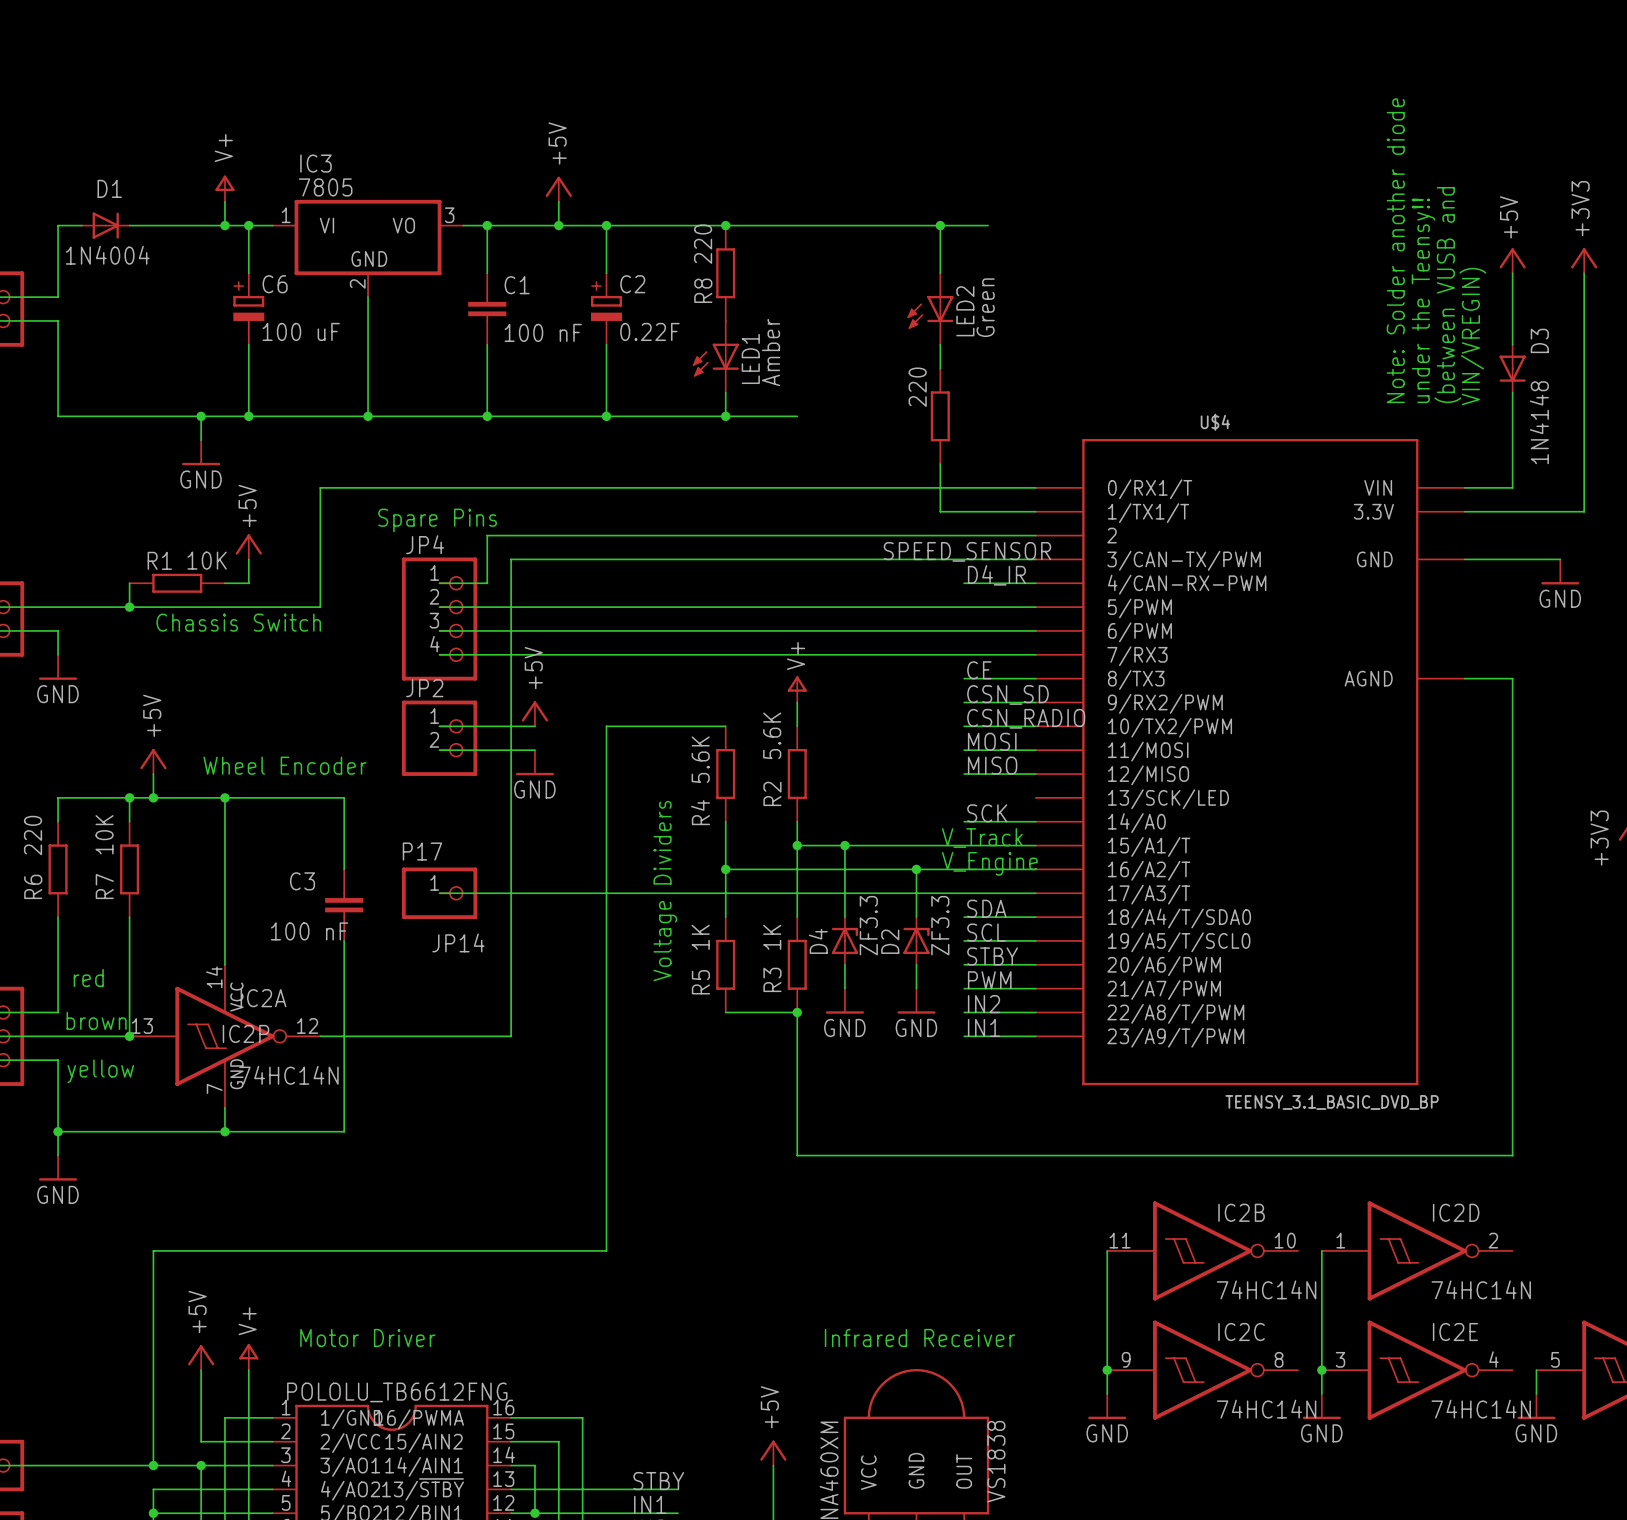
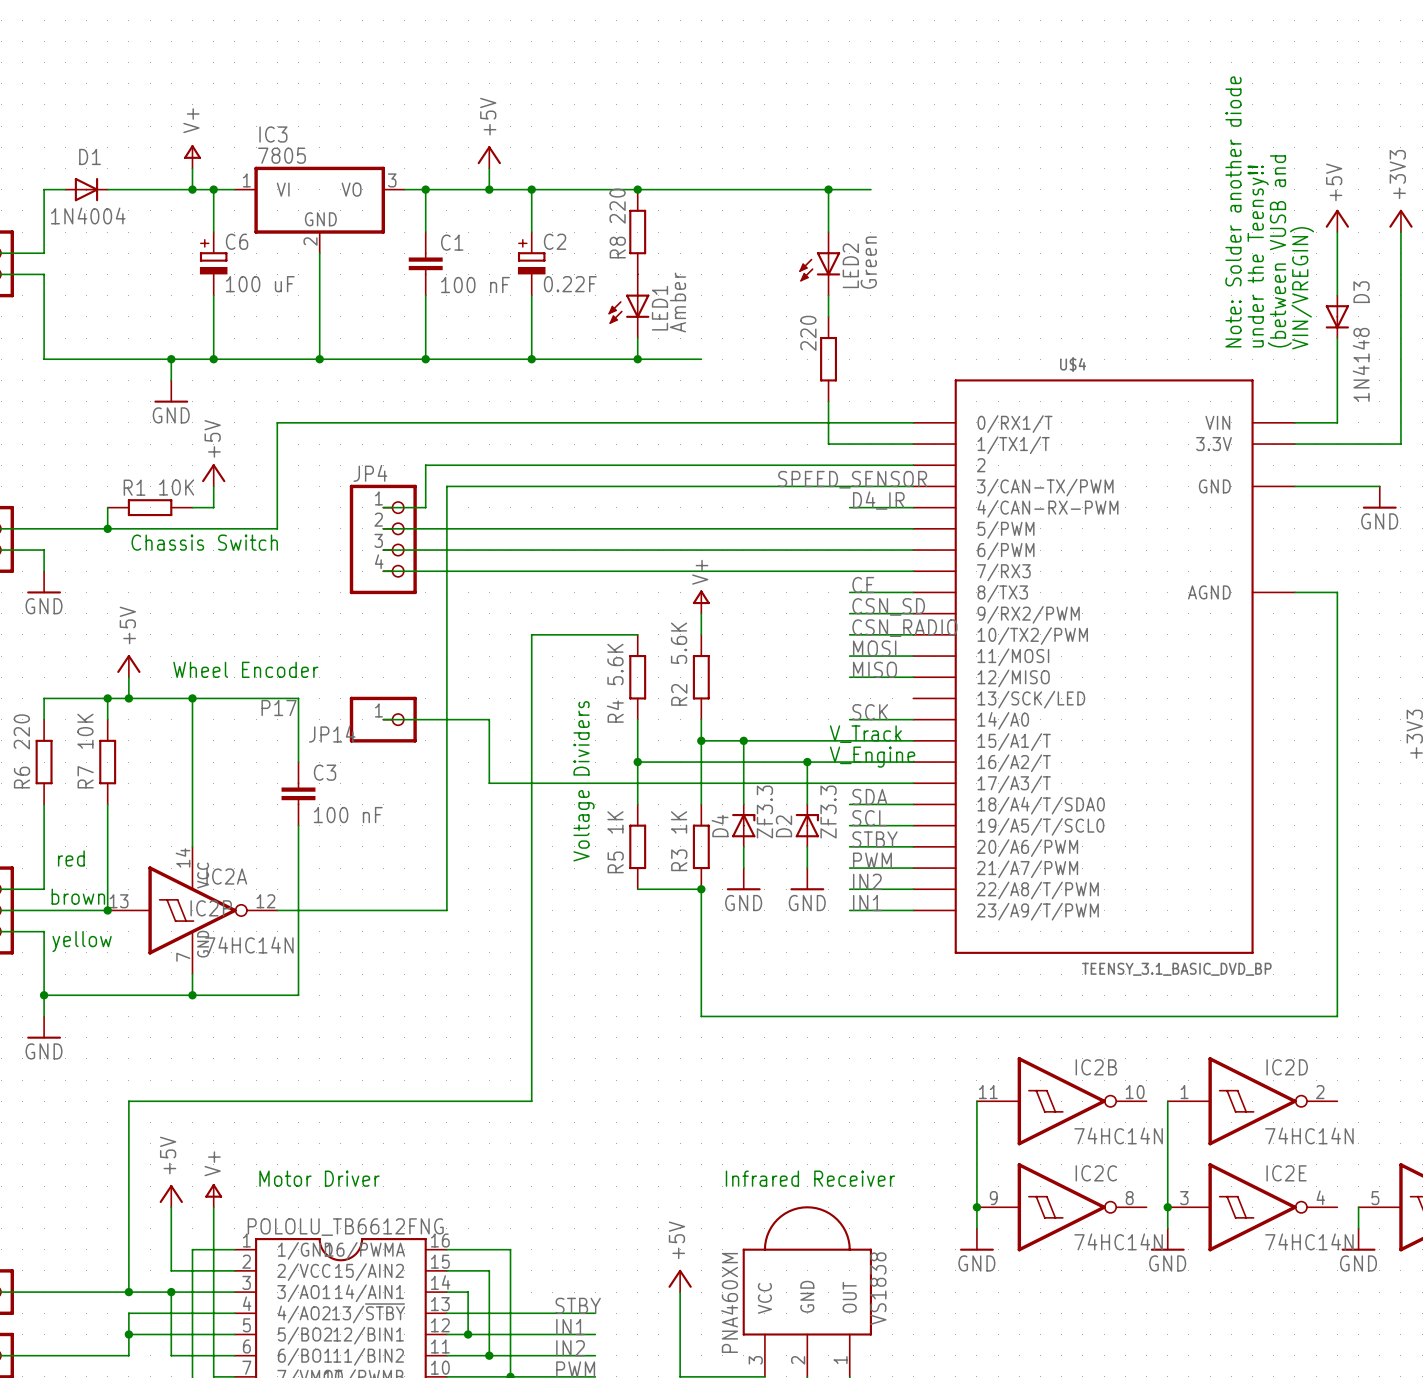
text: Spare Pins (437, 520) -> none
power symbol: +5V (534, 713) -> none
wire: (439, 726) (534, 726) -> none
JP2: (439, 738) -> none
wire: (439, 750) (534, 750) -> none
power symbol: GND (534, 762) -> none
JP14 value position: P17 (422, 851) -> P17 (279, 707)
C3 name position: C3 (302, 881) -> C3 (325, 772)
wire: (439, 893) (558, 893) -> (383, 719) (489, 719) (489, 783)
JP14 position: (439, 893) -> (383, 719)
C3 value position: 100 nF (309, 931) -> 100 nF (348, 815)
JP14 name position: JP14 (458, 942) -> JP14 (332, 734)

